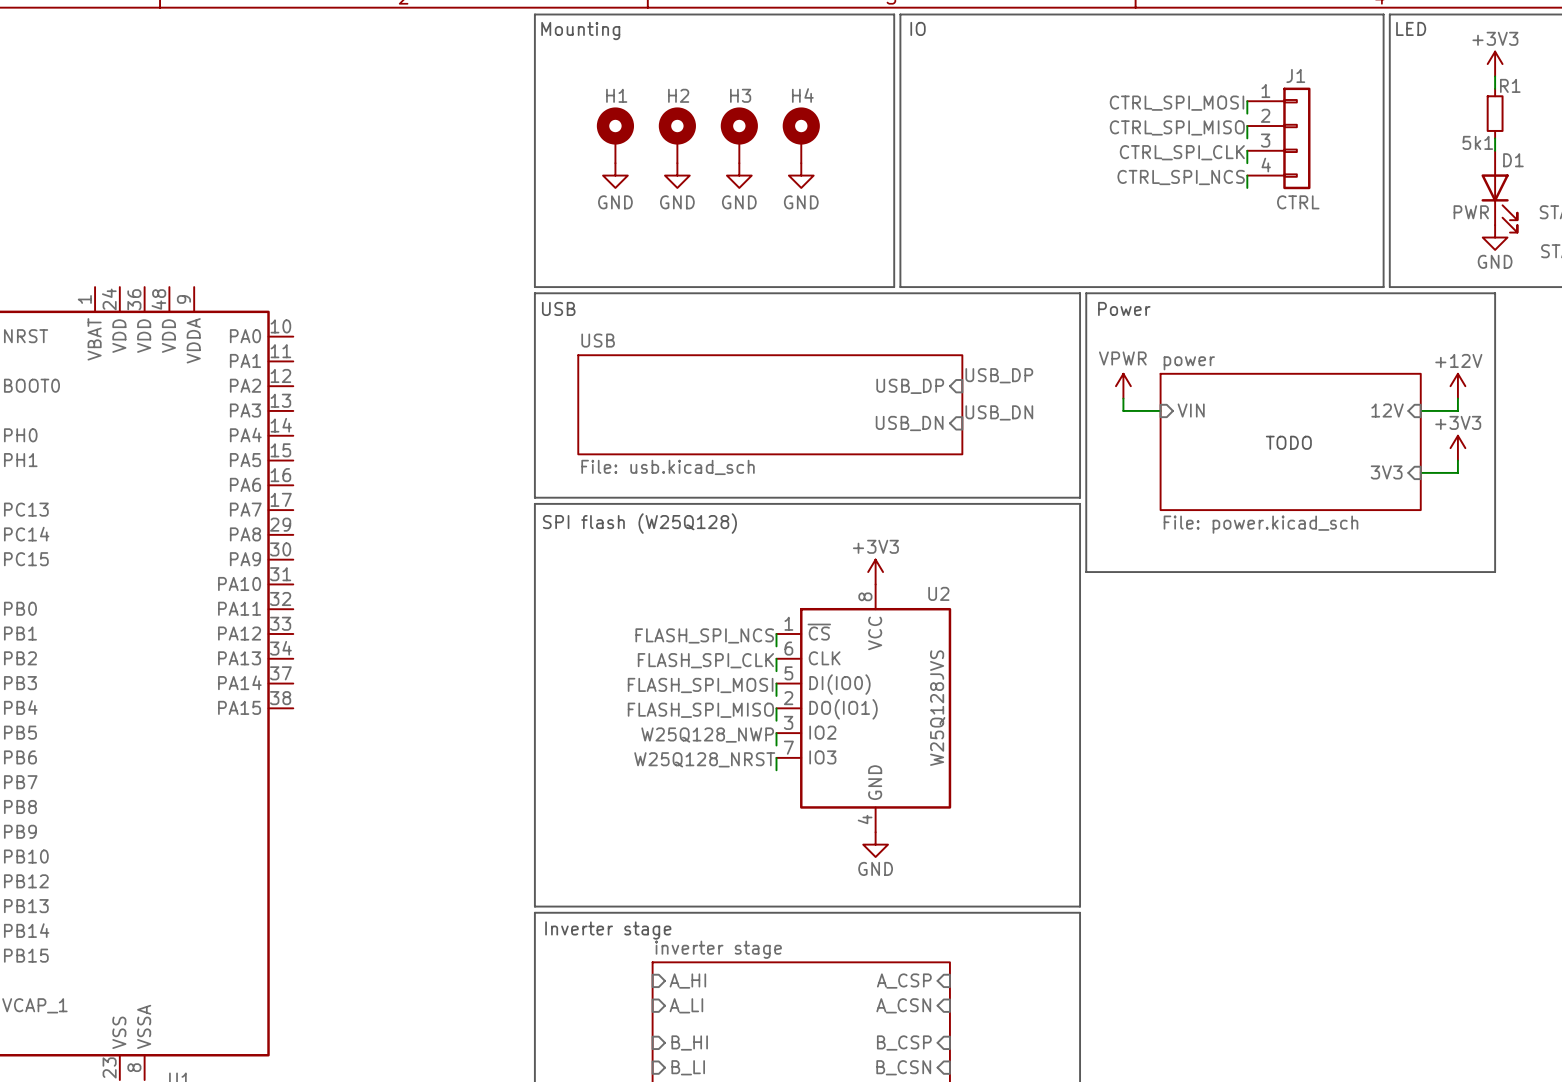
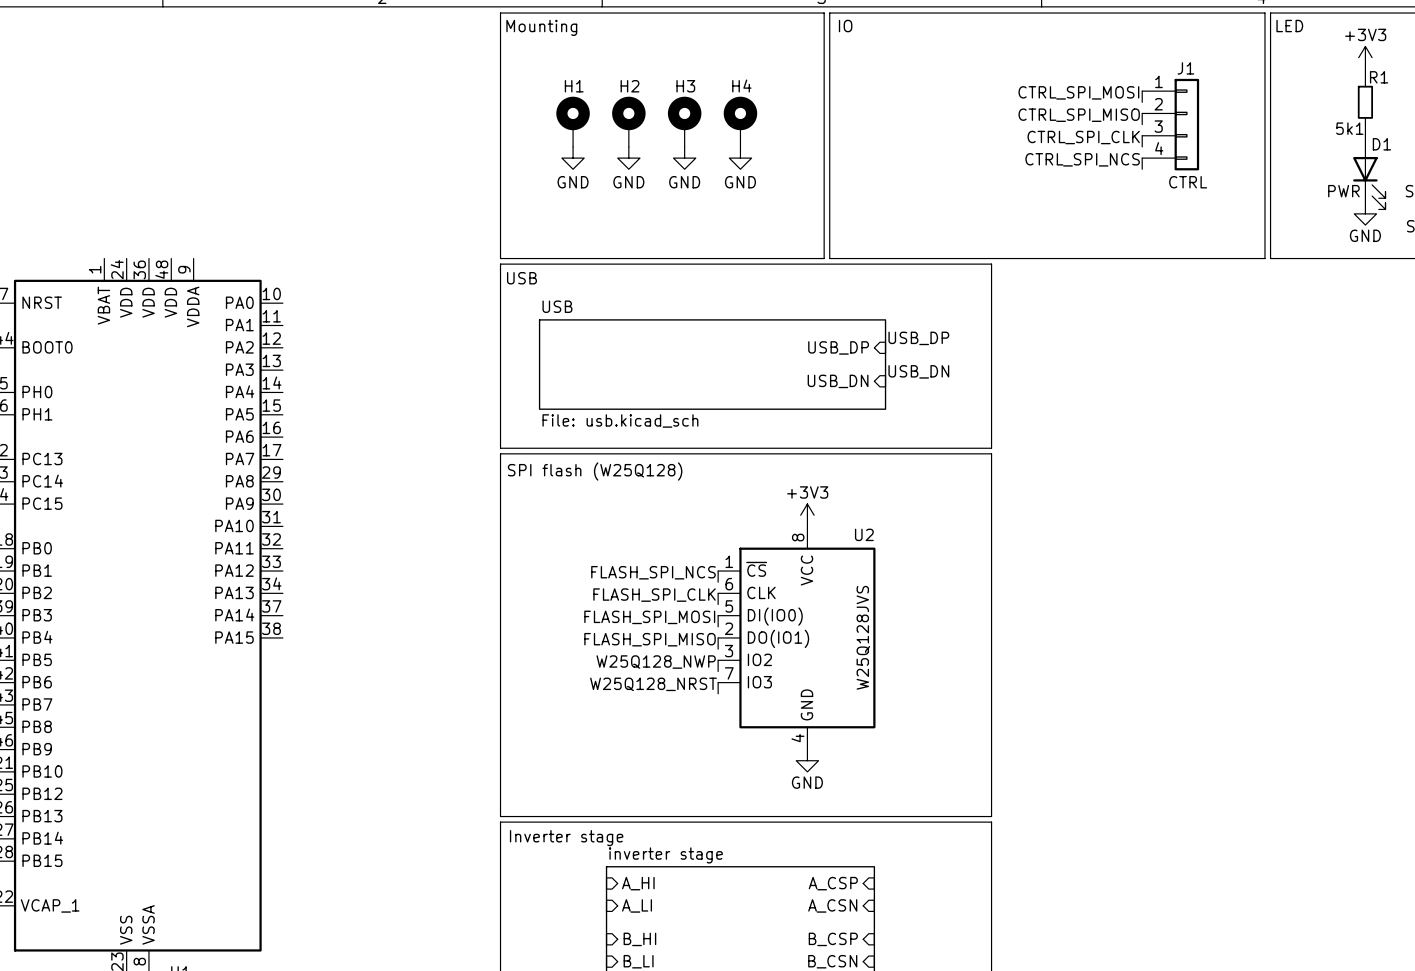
line: (1086, 293) (1495, 293) (1495, 572) (1086, 572) (1086, 293) -> none
text: Power (1124, 308) -> none
power symbol: VPWR (1123, 386) -> none
power symbol: +12V (1457, 386) -> none
wire: (1123, 398) (1123, 410) (1160, 410) -> none
wire: (1457, 398) (1457, 410) (1420, 410) -> none
sheet pin: VIN (1191, 410) -> none
sheet pin: 12V (1387, 410) -> none
sheet power: File: power.kicad_sch (1290, 441) -> none
text: TODO (1288, 442) -> none
power symbol: +3V3 (1457, 448) -> none
wire: (1457, 460) (1457, 472) (1420, 472) -> none
sheet pin: 3V3 (1386, 472) -> none

